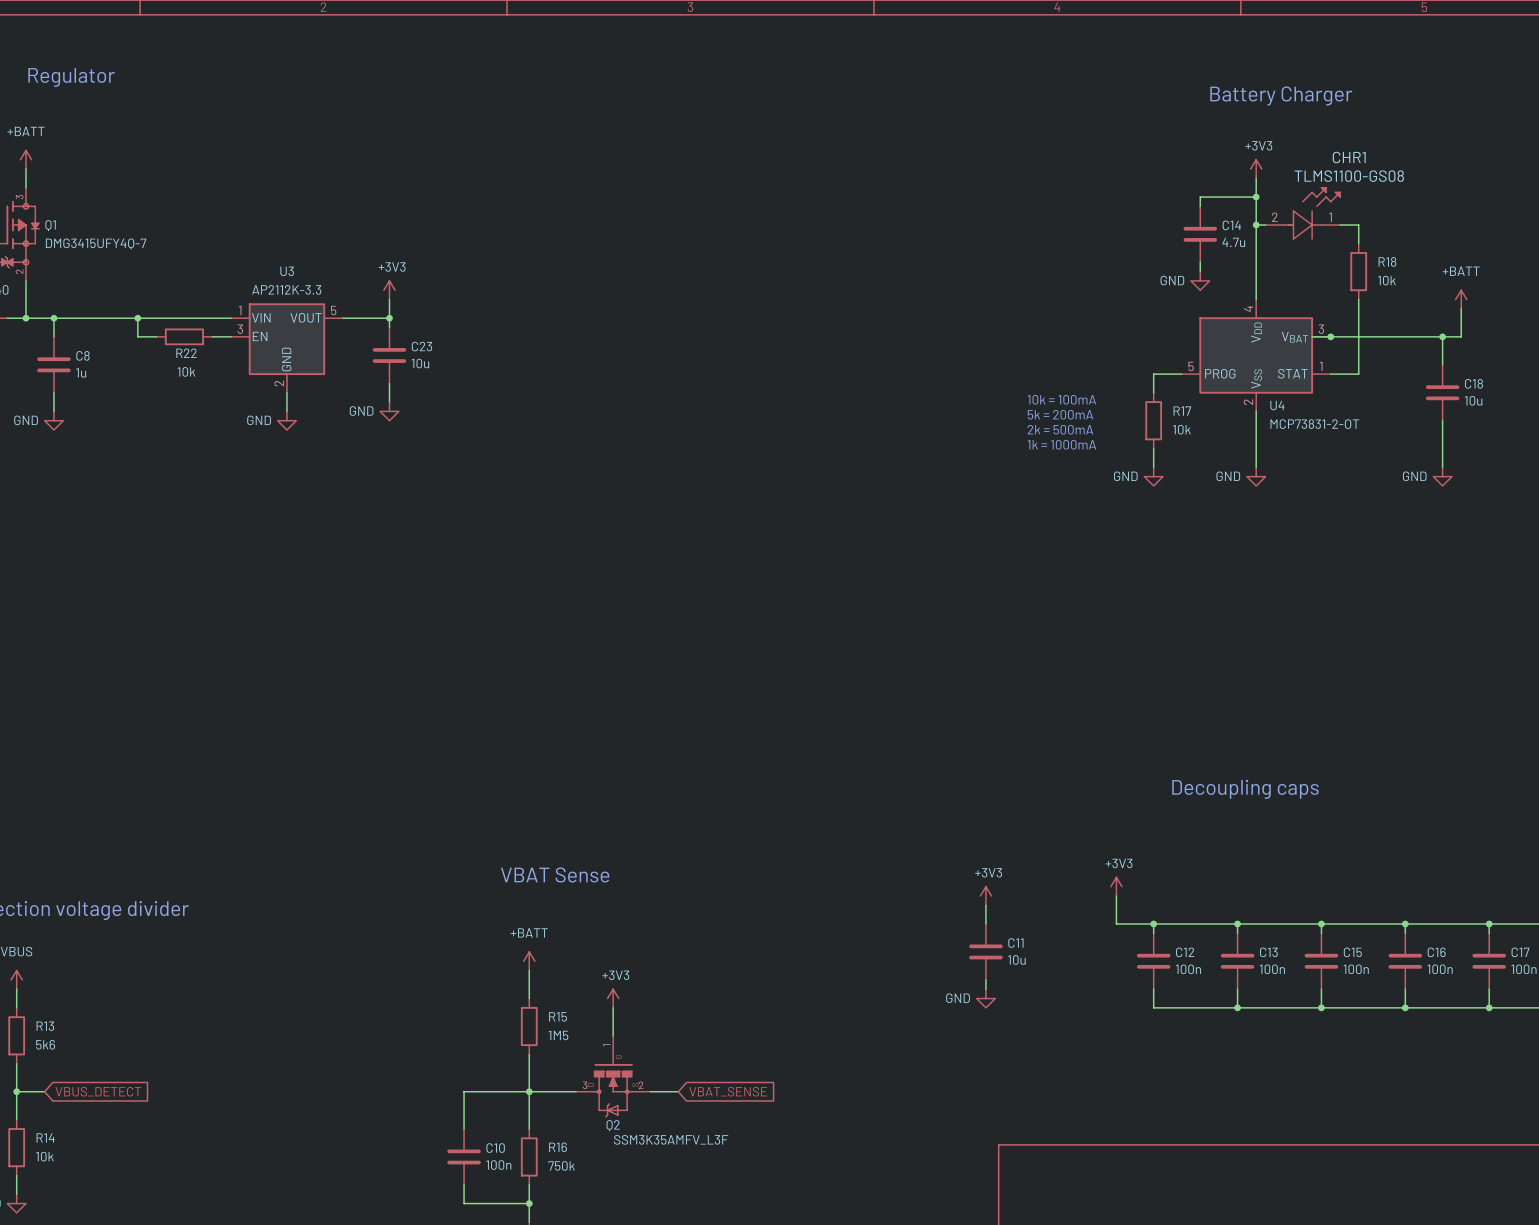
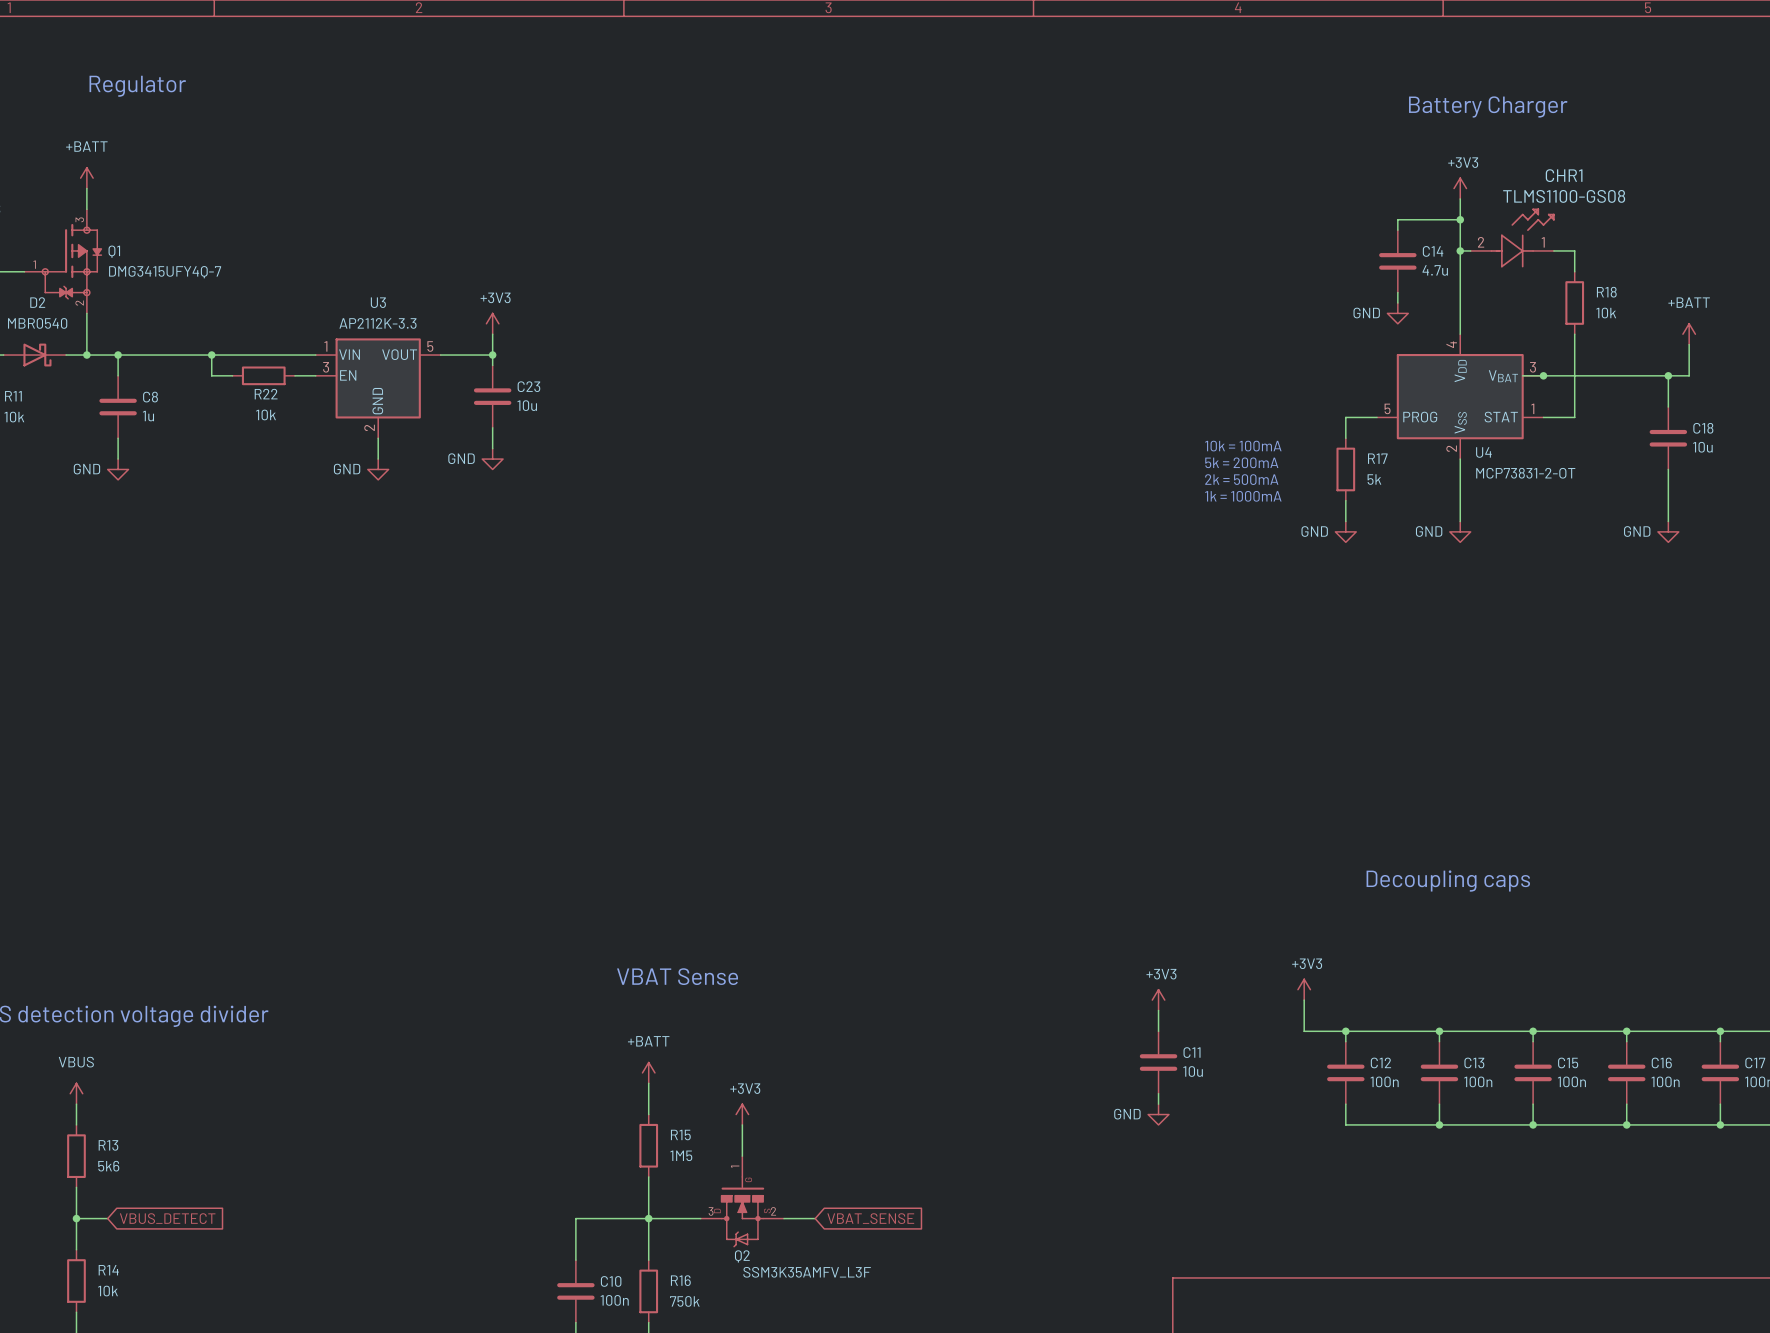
R17 value: 10k (1181, 429) -> 5k (1374, 479)

